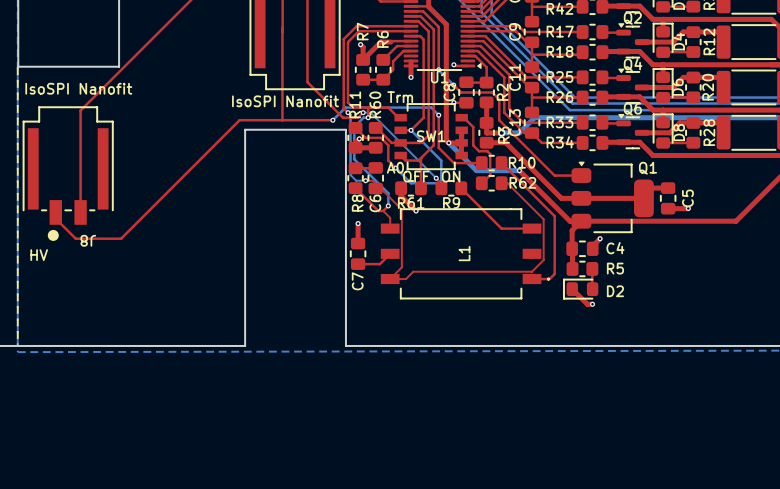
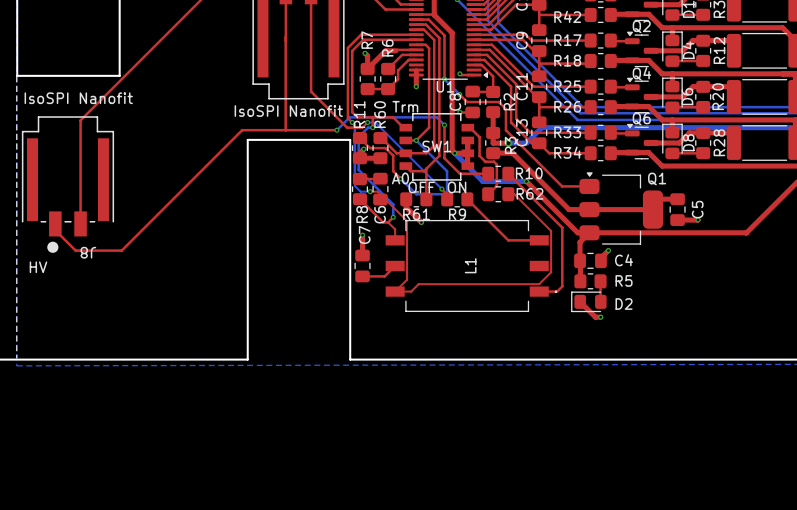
C7 name position: C7 (357, 281) -> C7 (364, 234)

